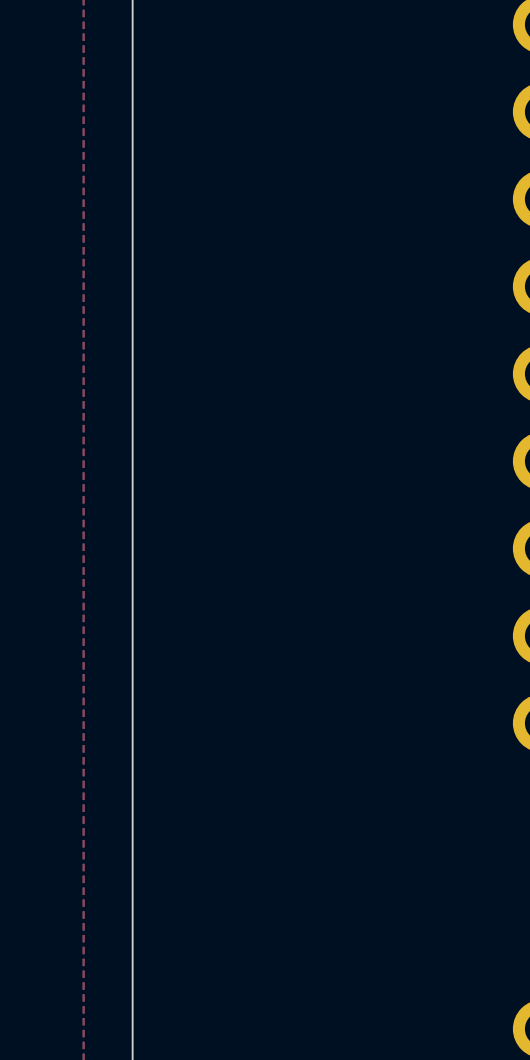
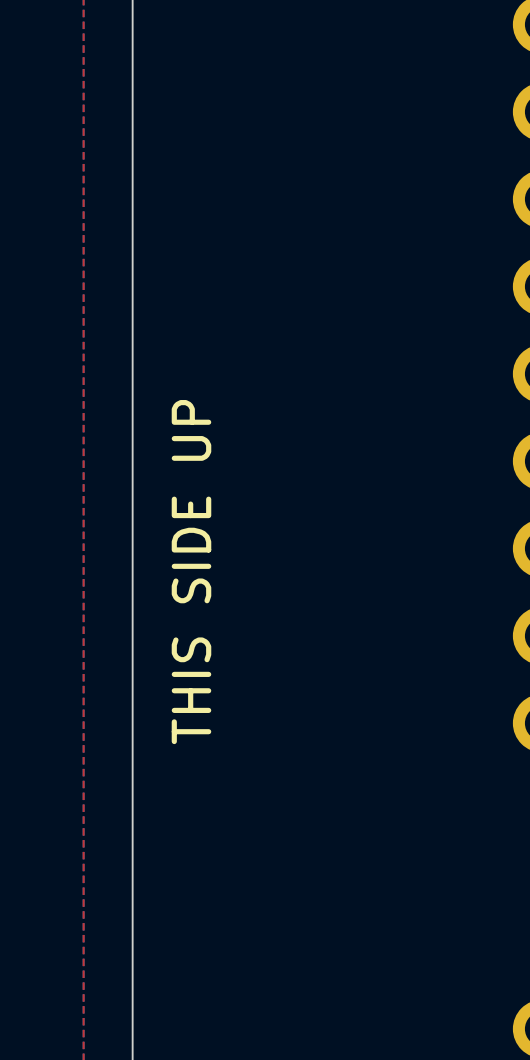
text: none -> THIS SIDE UP (191, 572)

